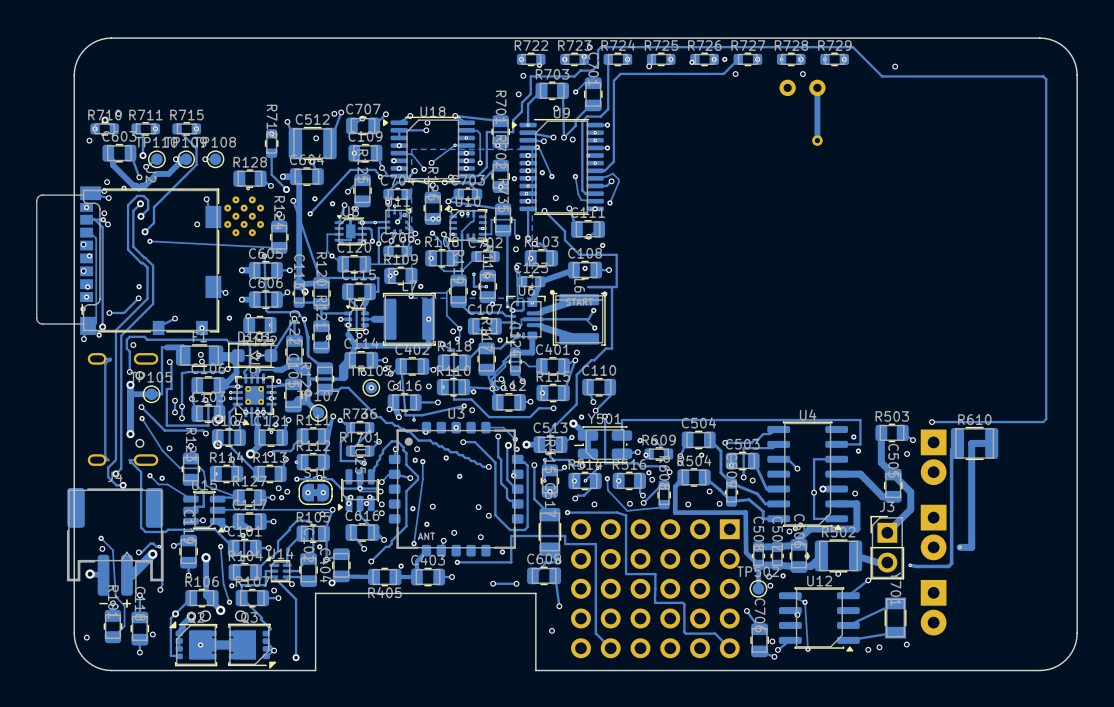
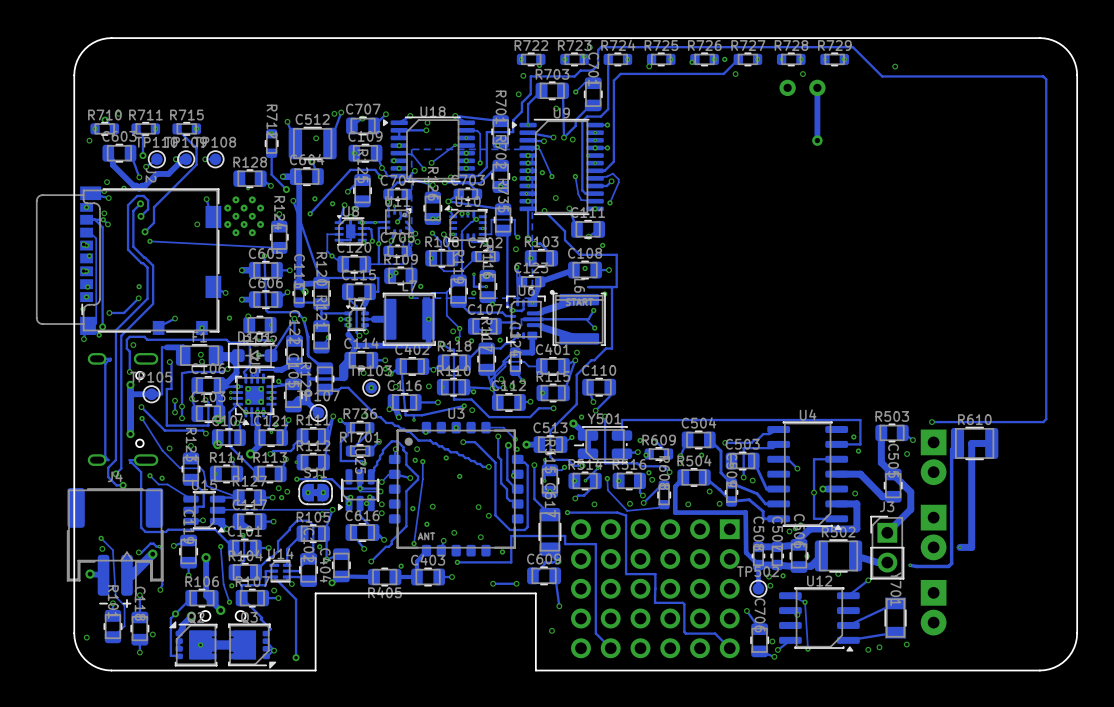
via: none -> (595, 147)
via: none -> (476, 219)
via: none -> (86, 245)
via: none -> (86, 271)
via: none -> (348, 319)

